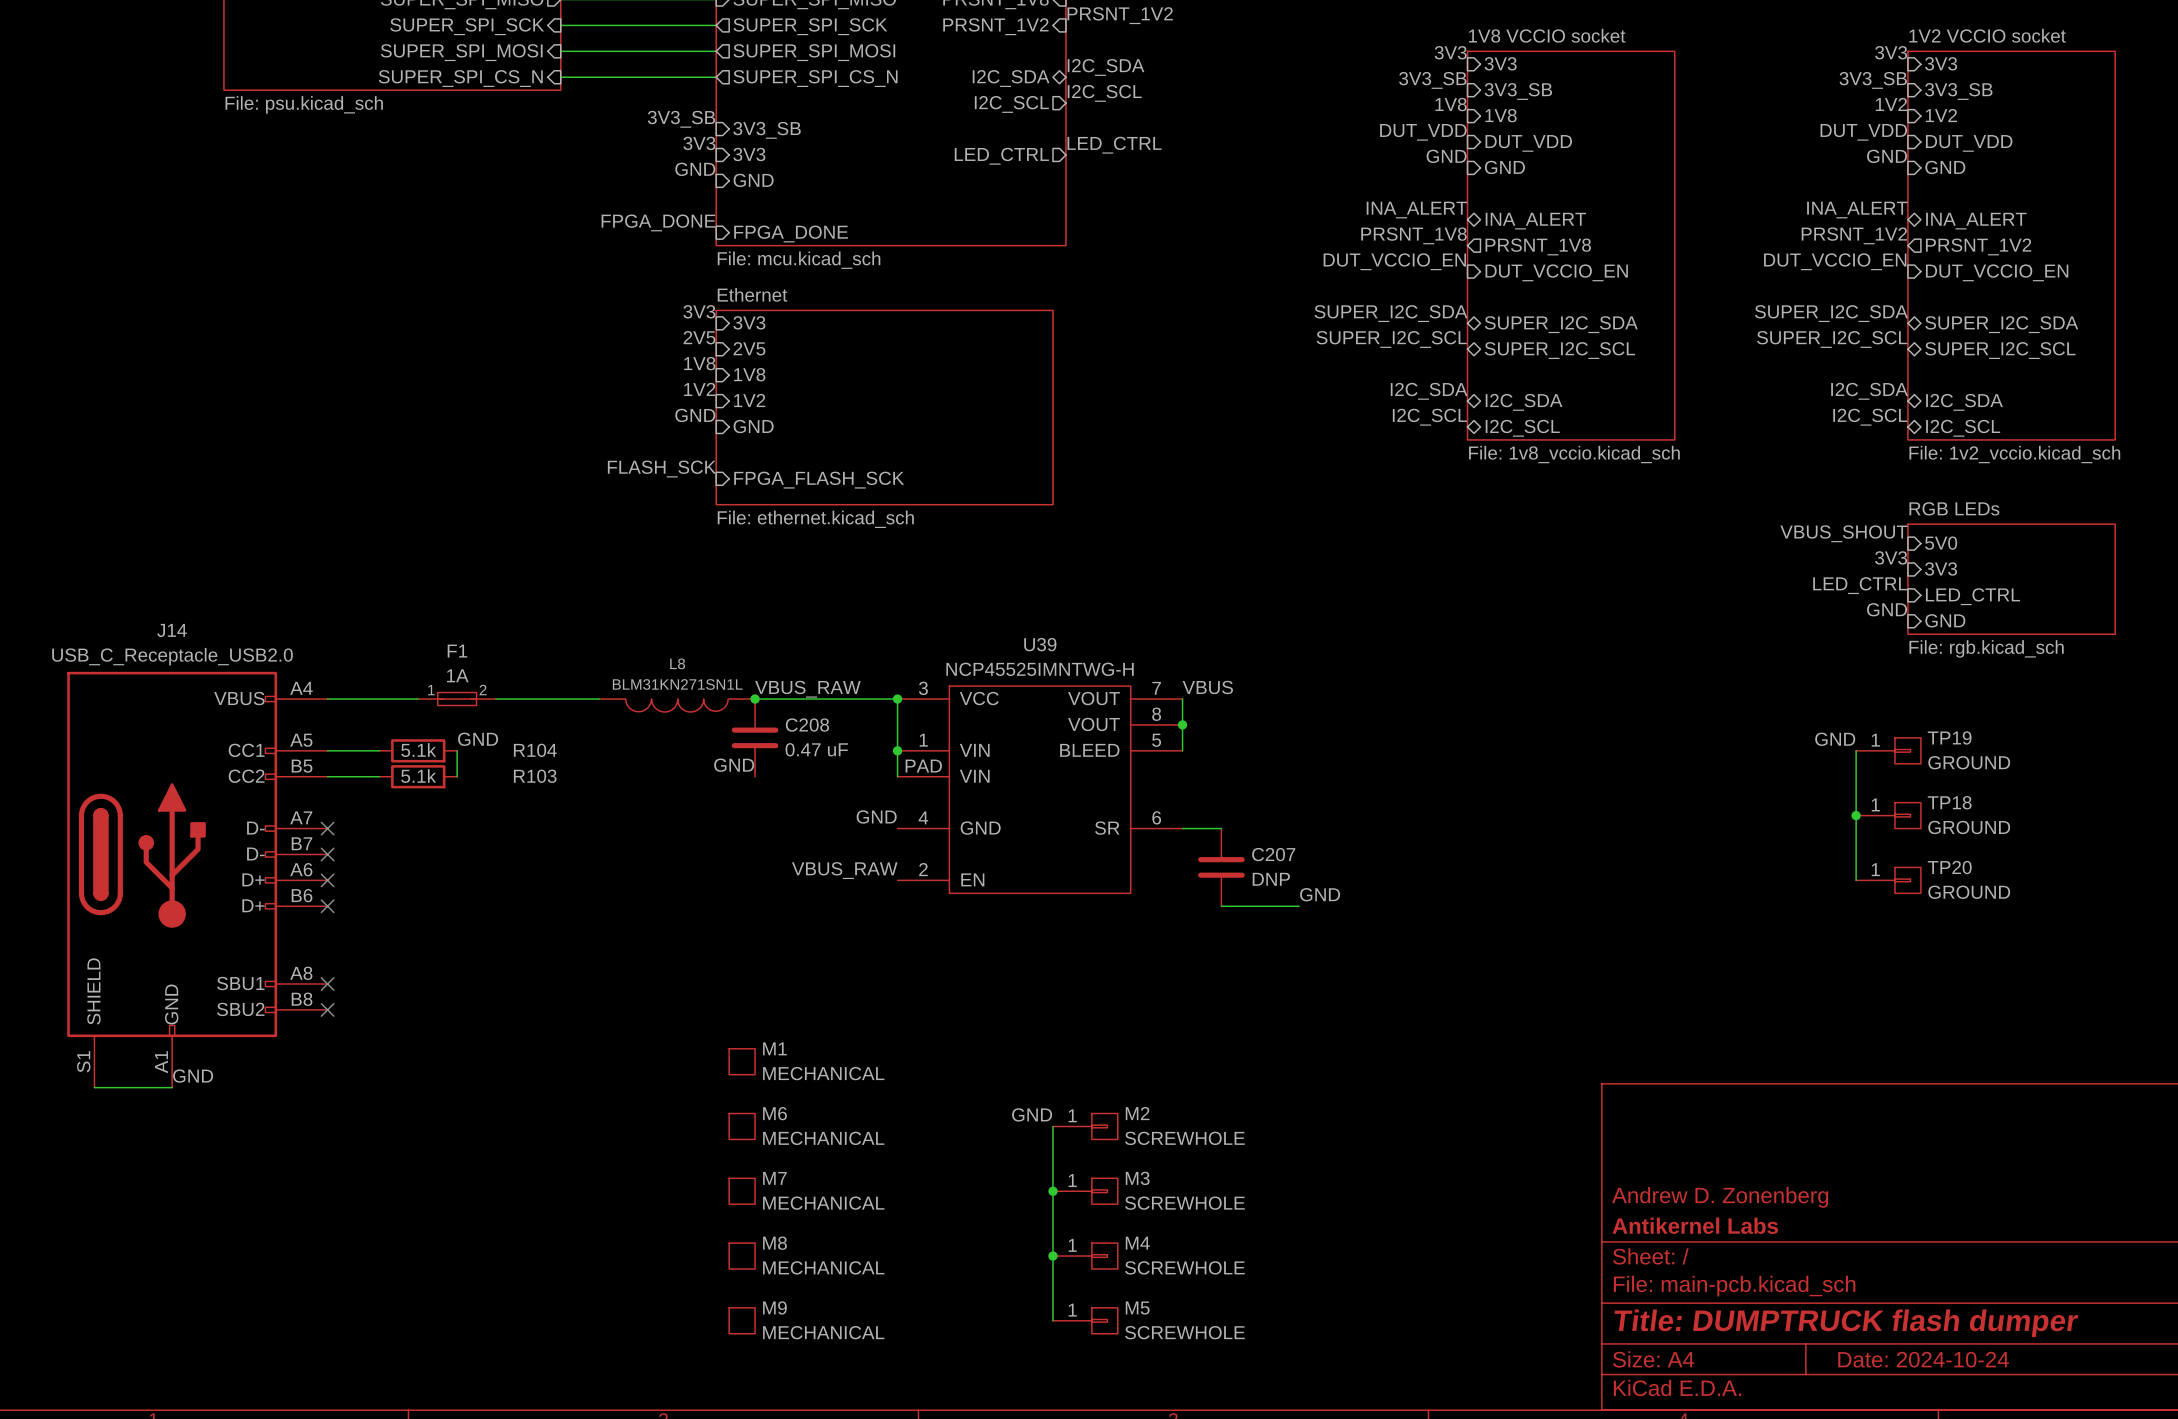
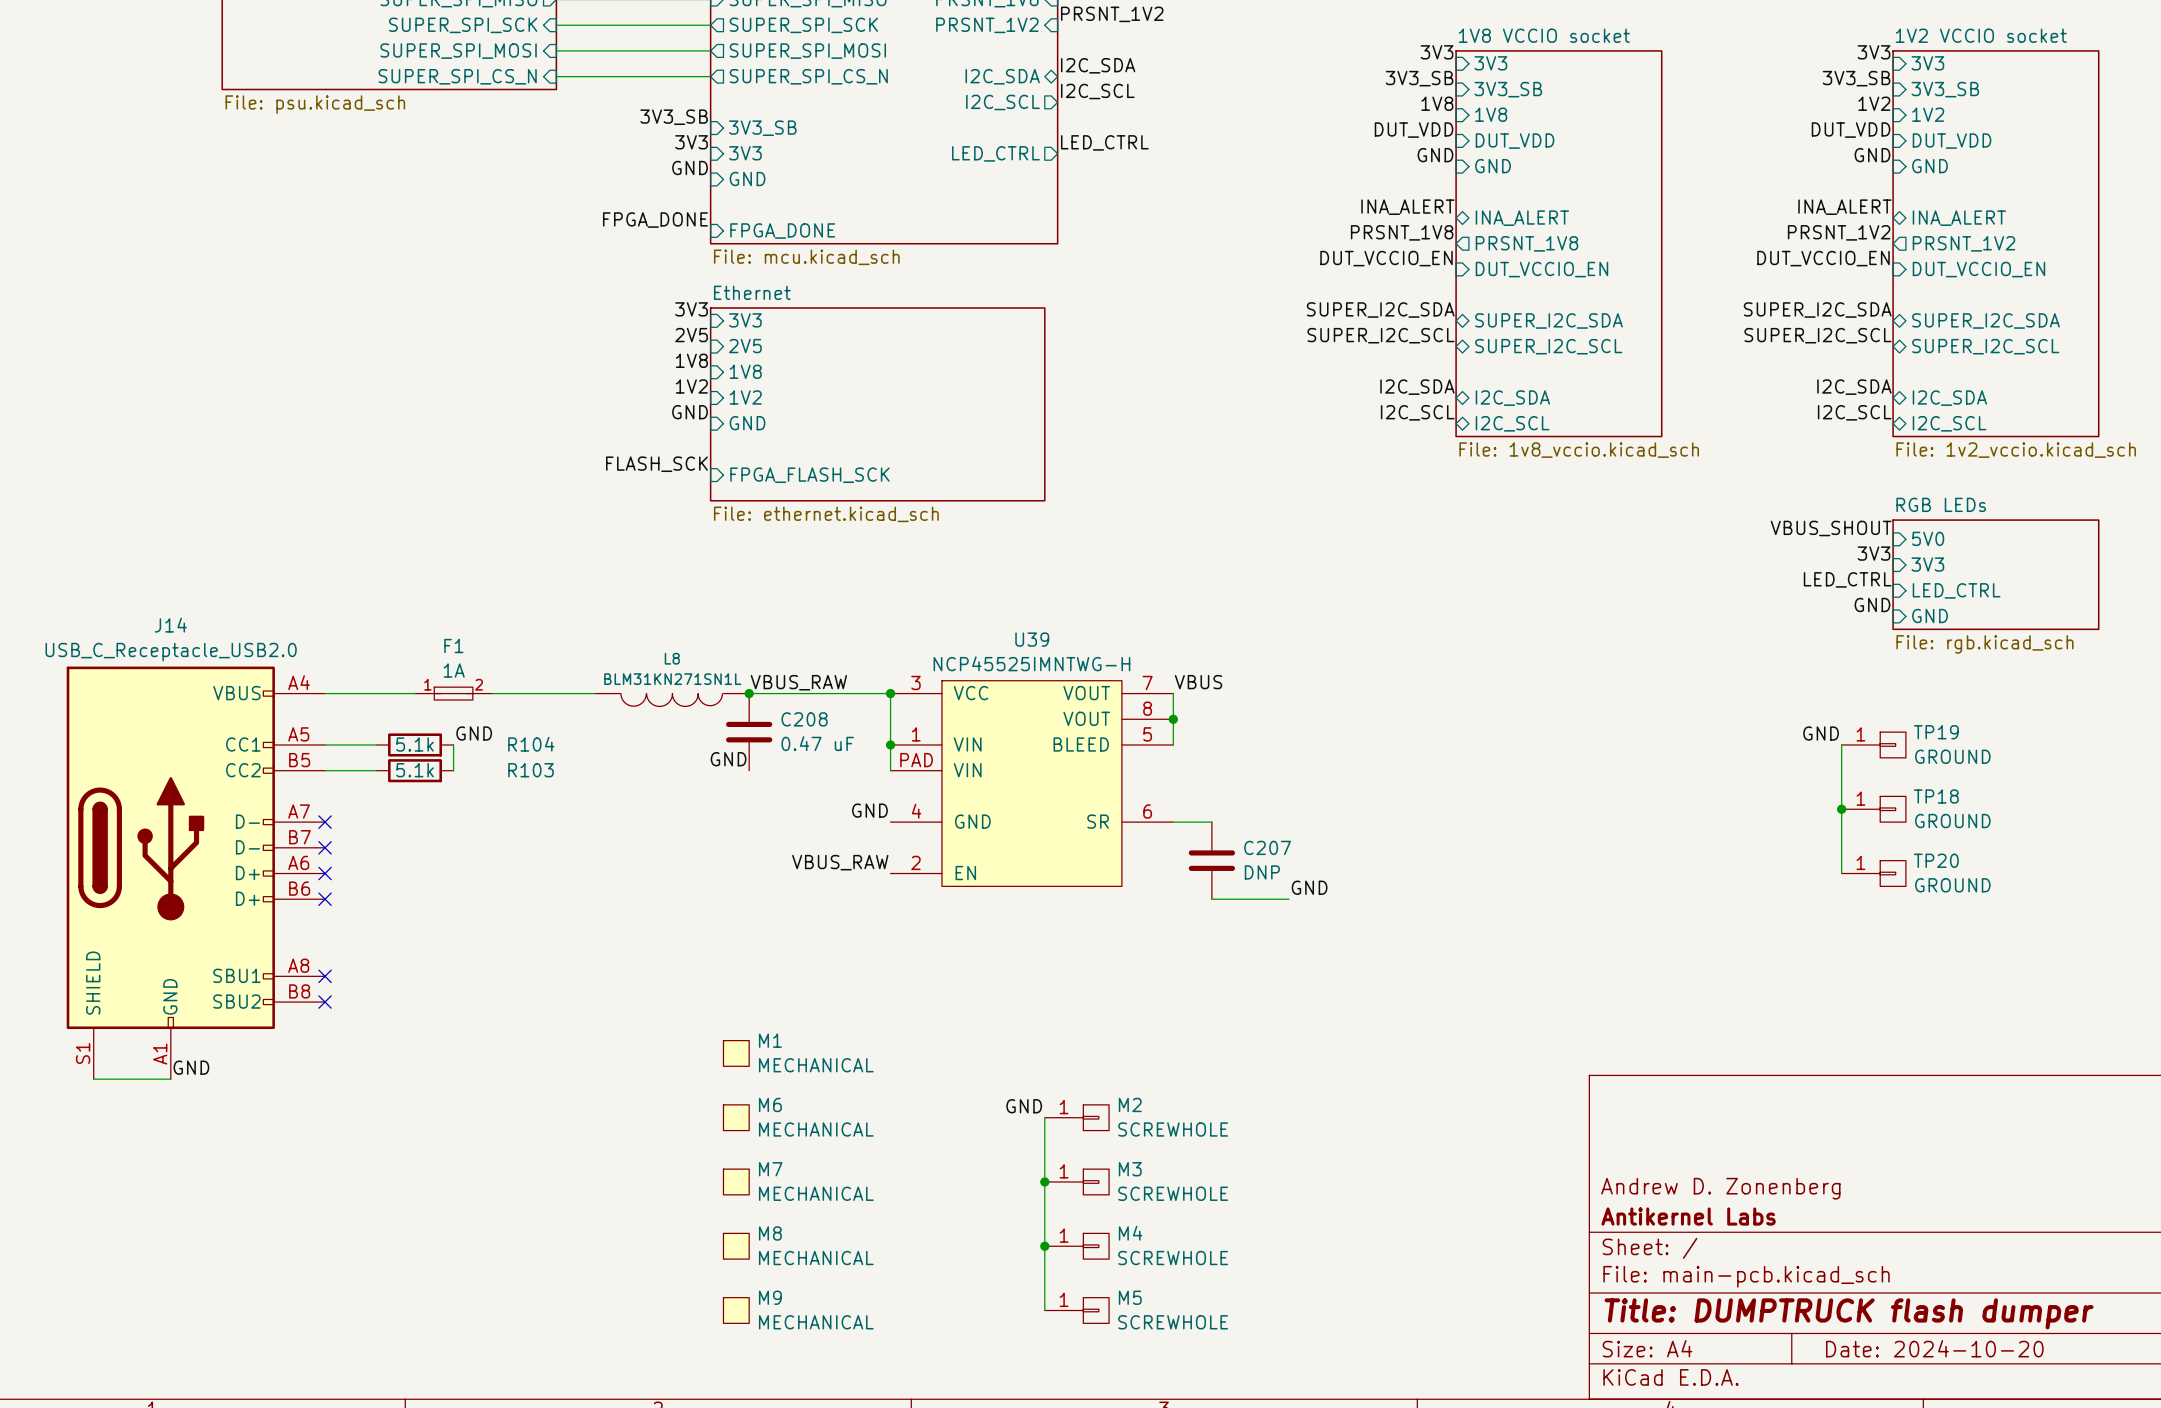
title block: Date: 2024-10-24 (1923, 1359) -> Date: 2024-10-20 (1934, 1348)

